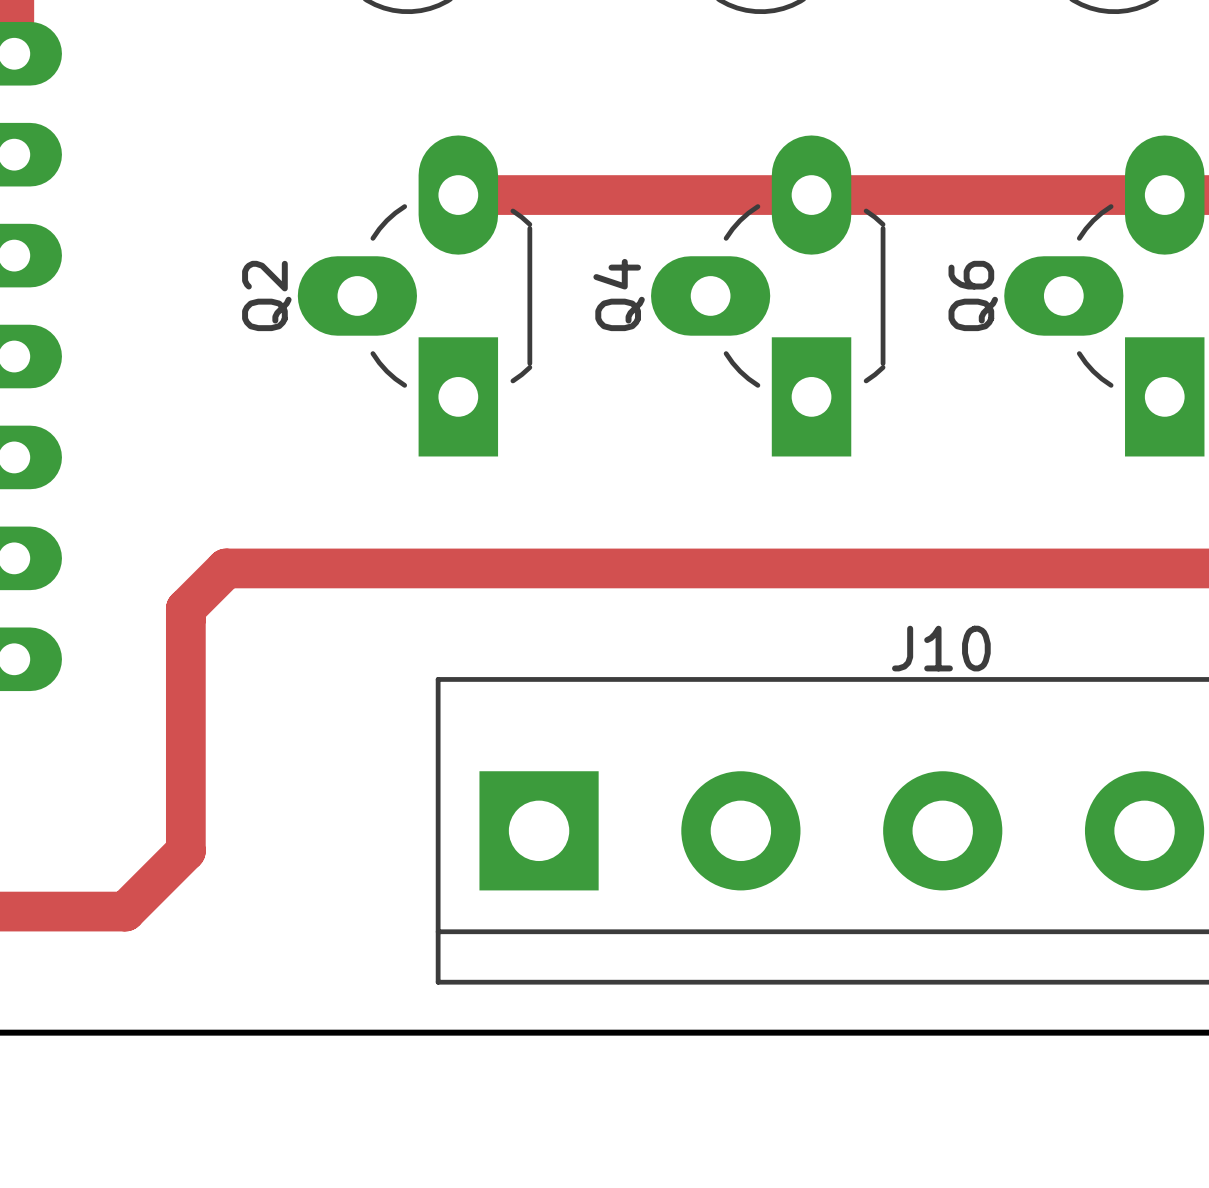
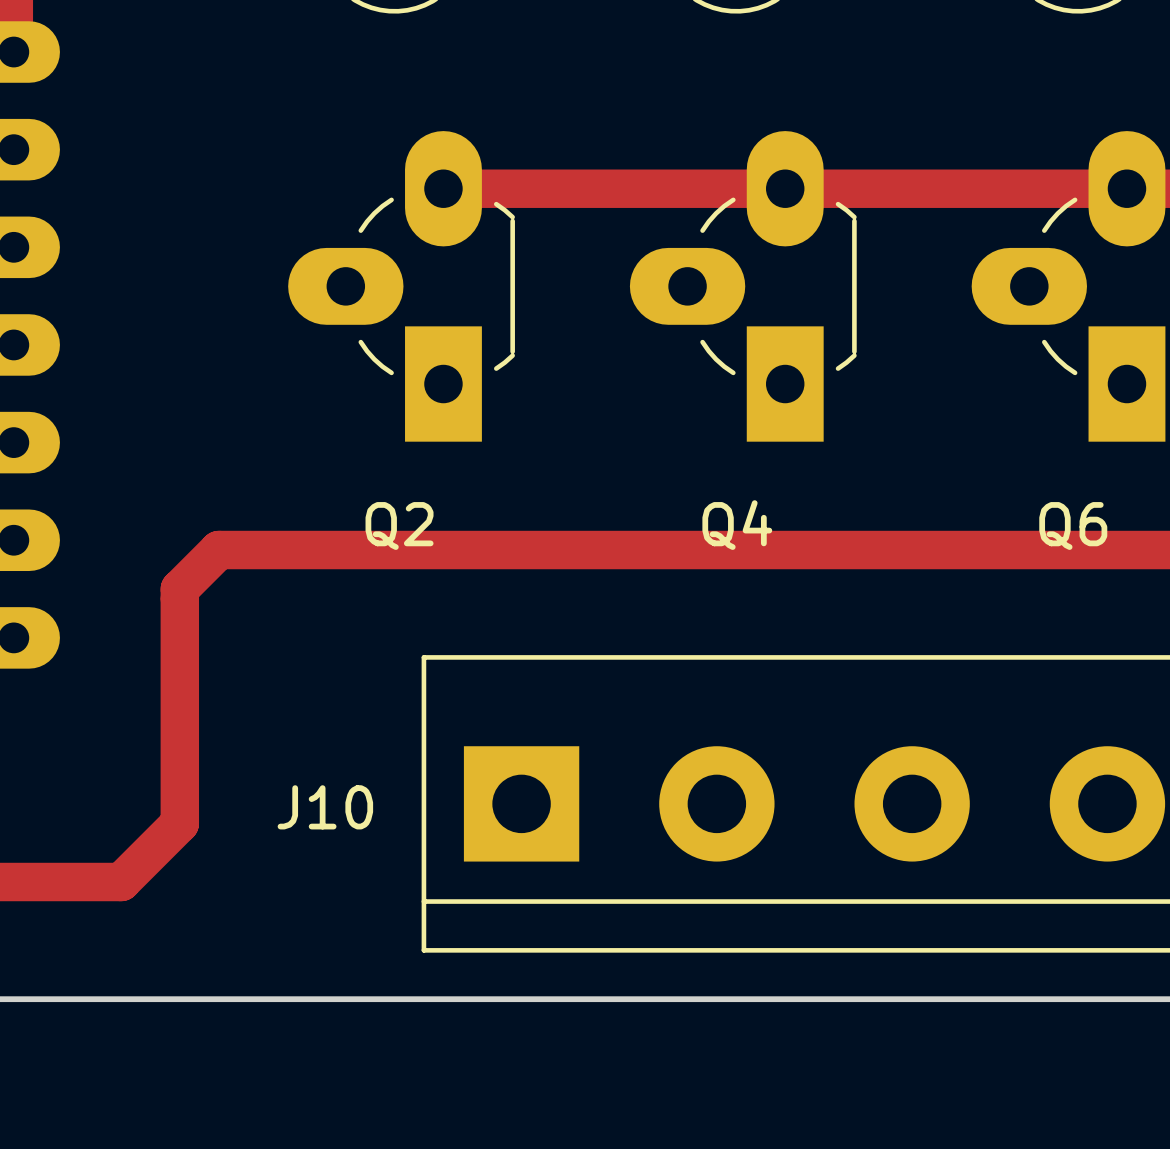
Q2 name rotation: 0° (266, 295) -> 90° clockwise (399, 525)
Q2 name position: Q2 (266, 295) -> Q2 (399, 525)
Q4 name rotation: 0° (619, 295) -> 90° clockwise (737, 525)
Q4 name position: Q4 (619, 295) -> Q4 (737, 525)
Q6 name rotation: 0° (973, 295) -> 90° clockwise (1073, 525)
Q6 name position: Q6 (973, 295) -> Q6 (1073, 525)
J10 name position: J10 (941, 648) -> J10 (325, 807)

